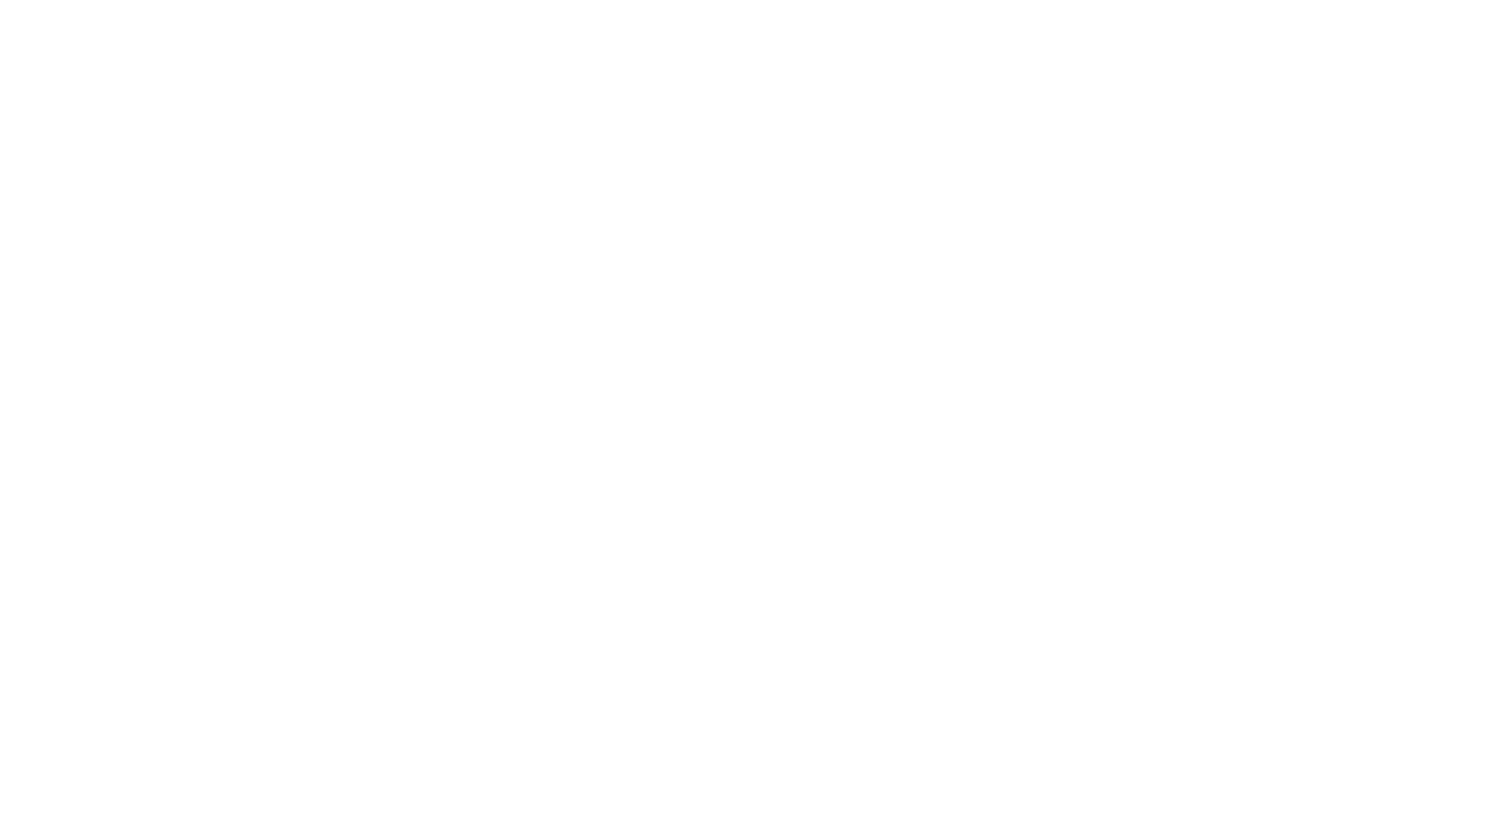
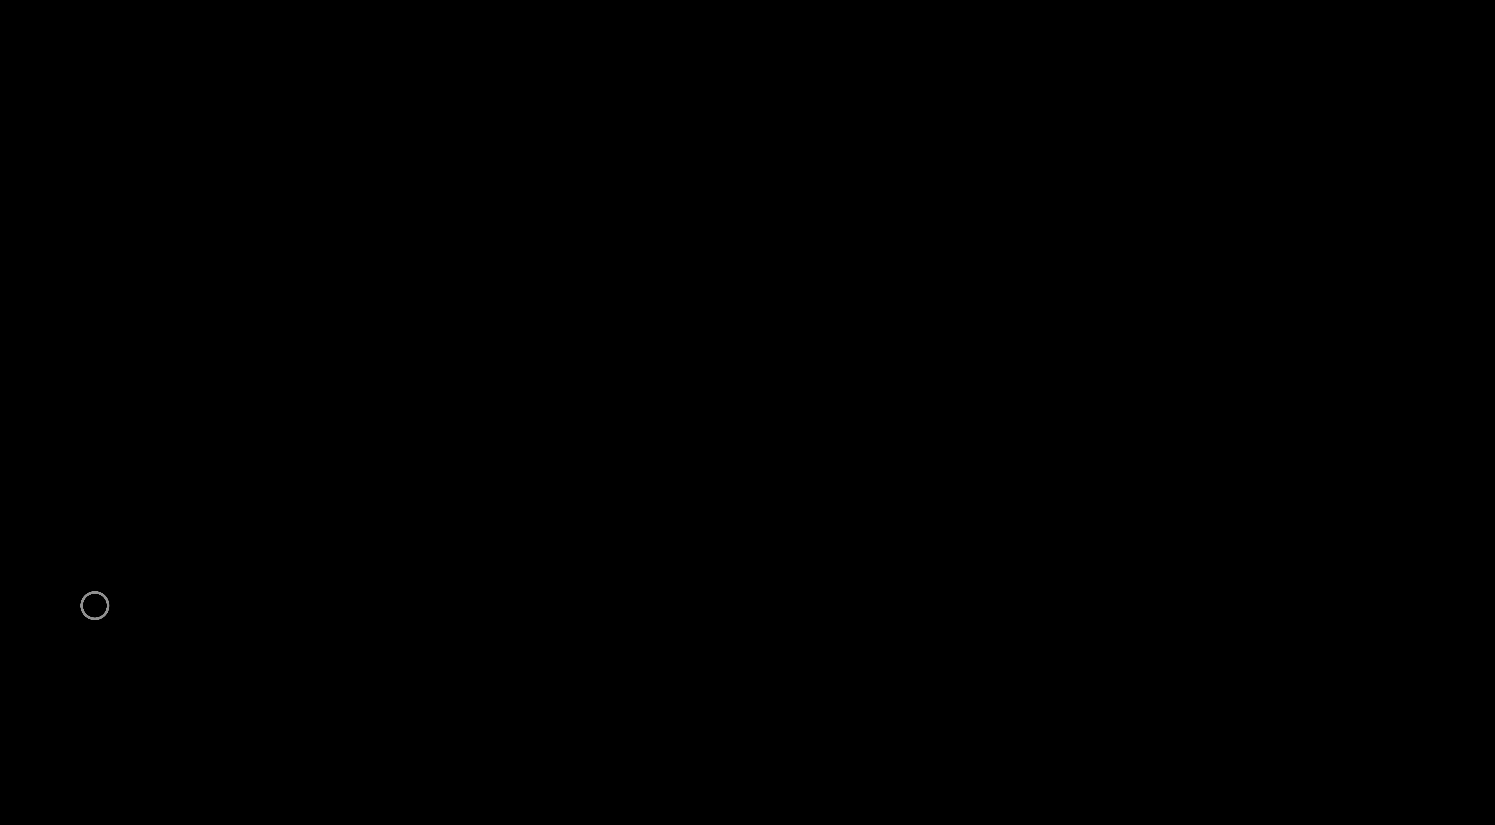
drawing: none -> [80, 591, 110, 620]

